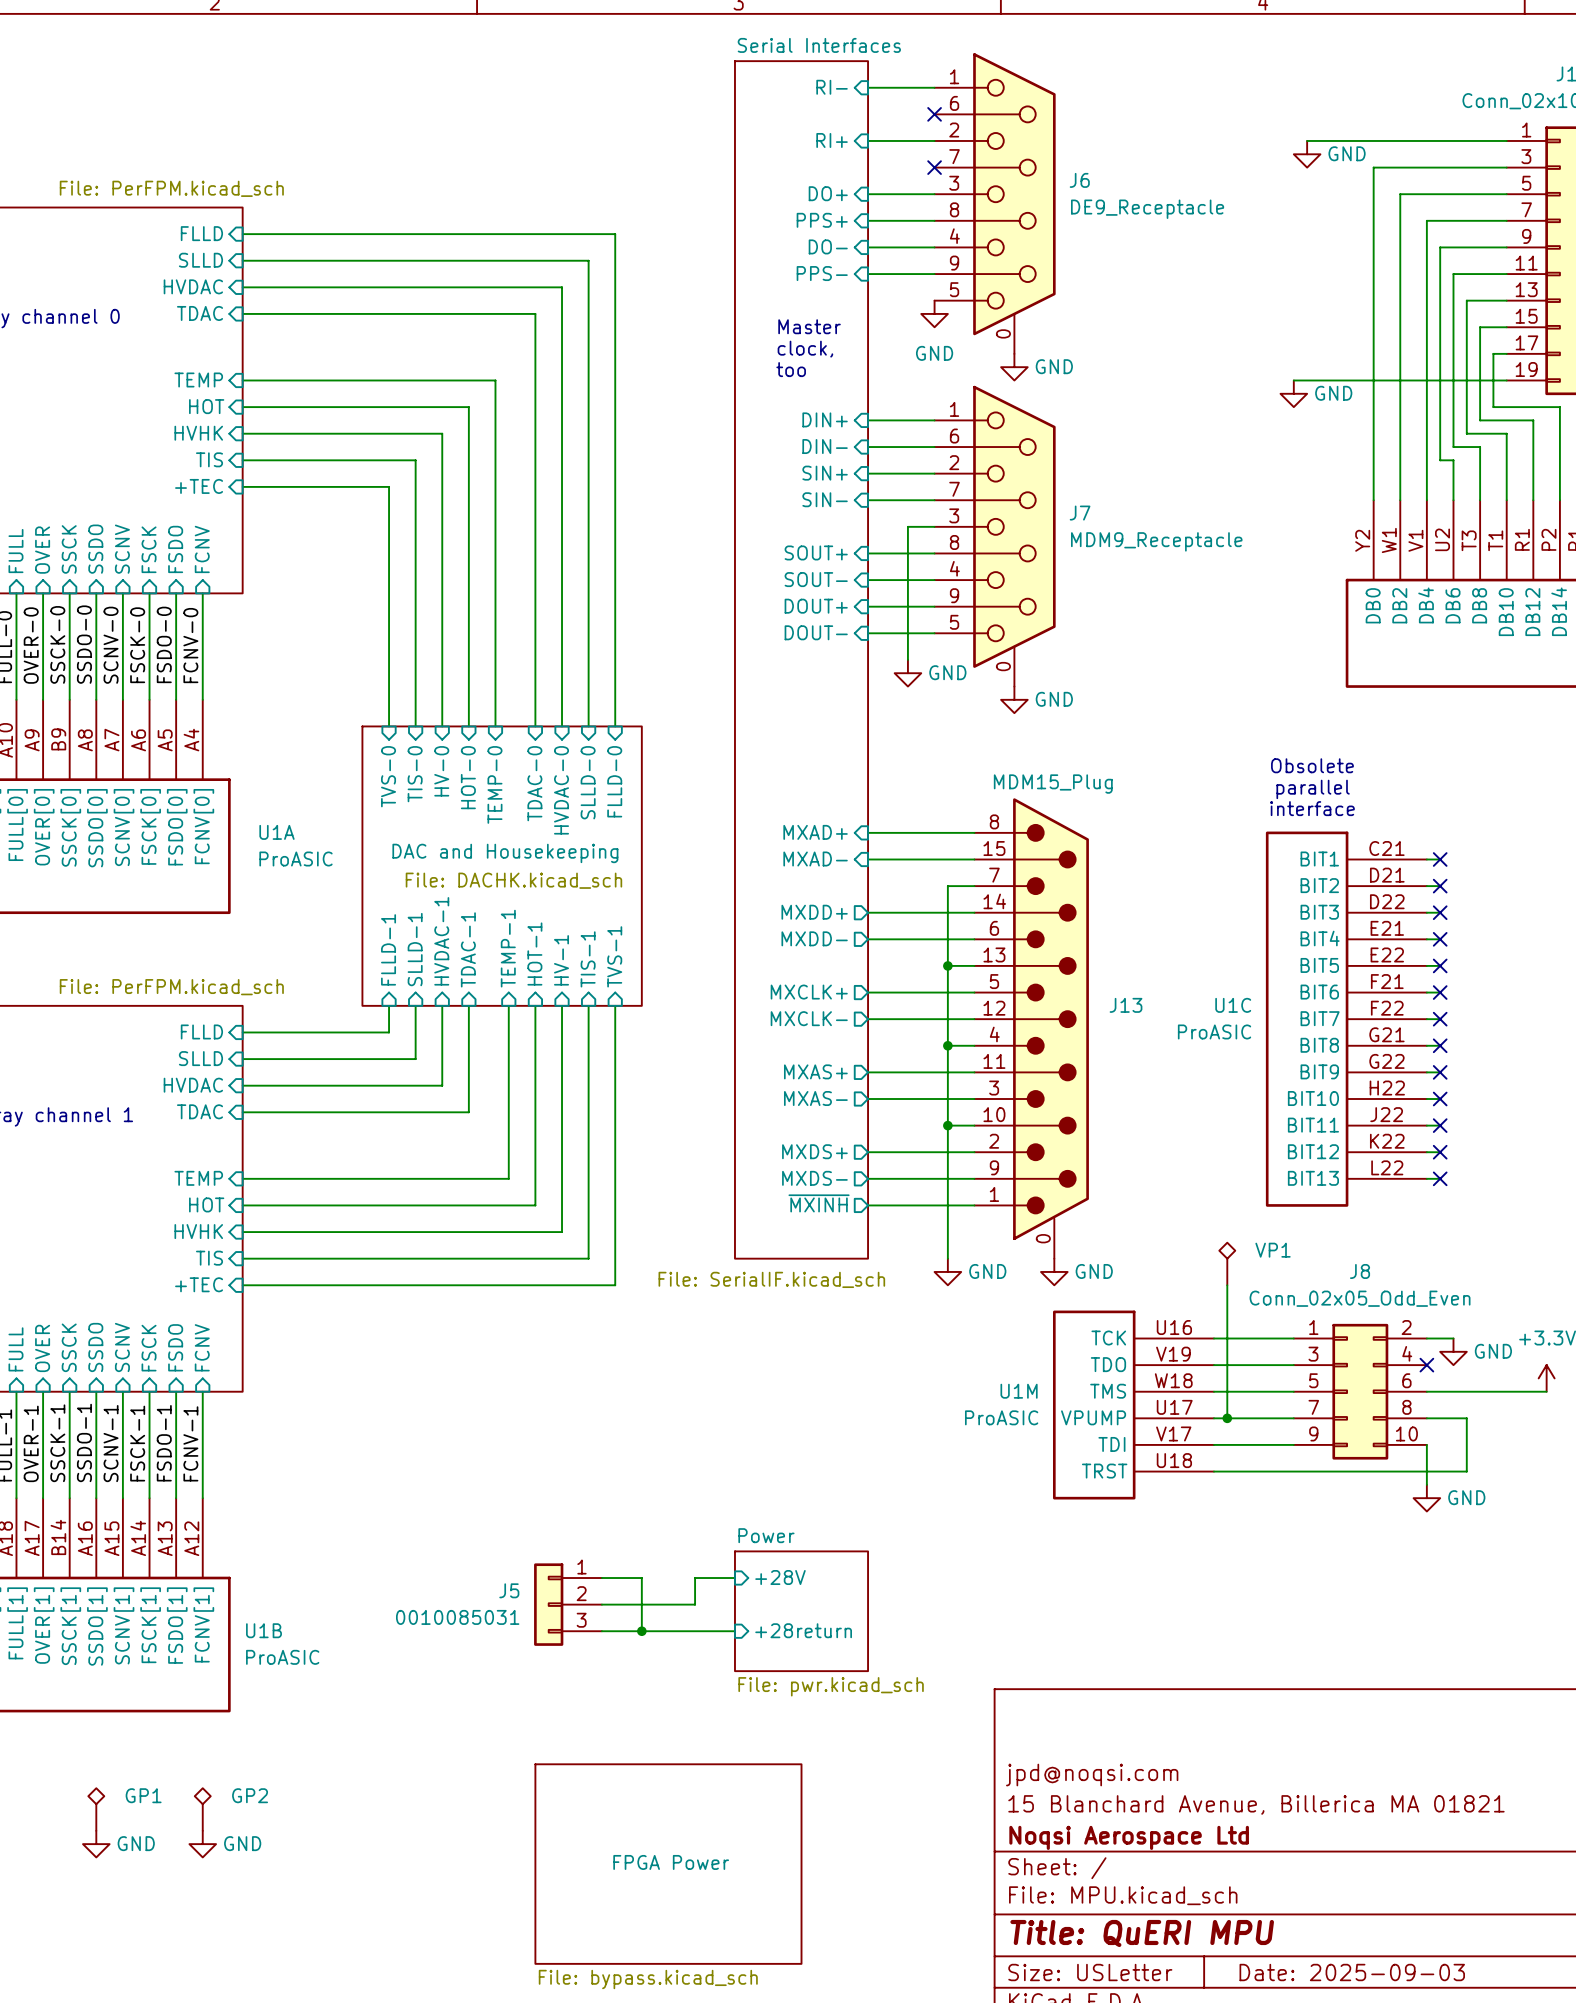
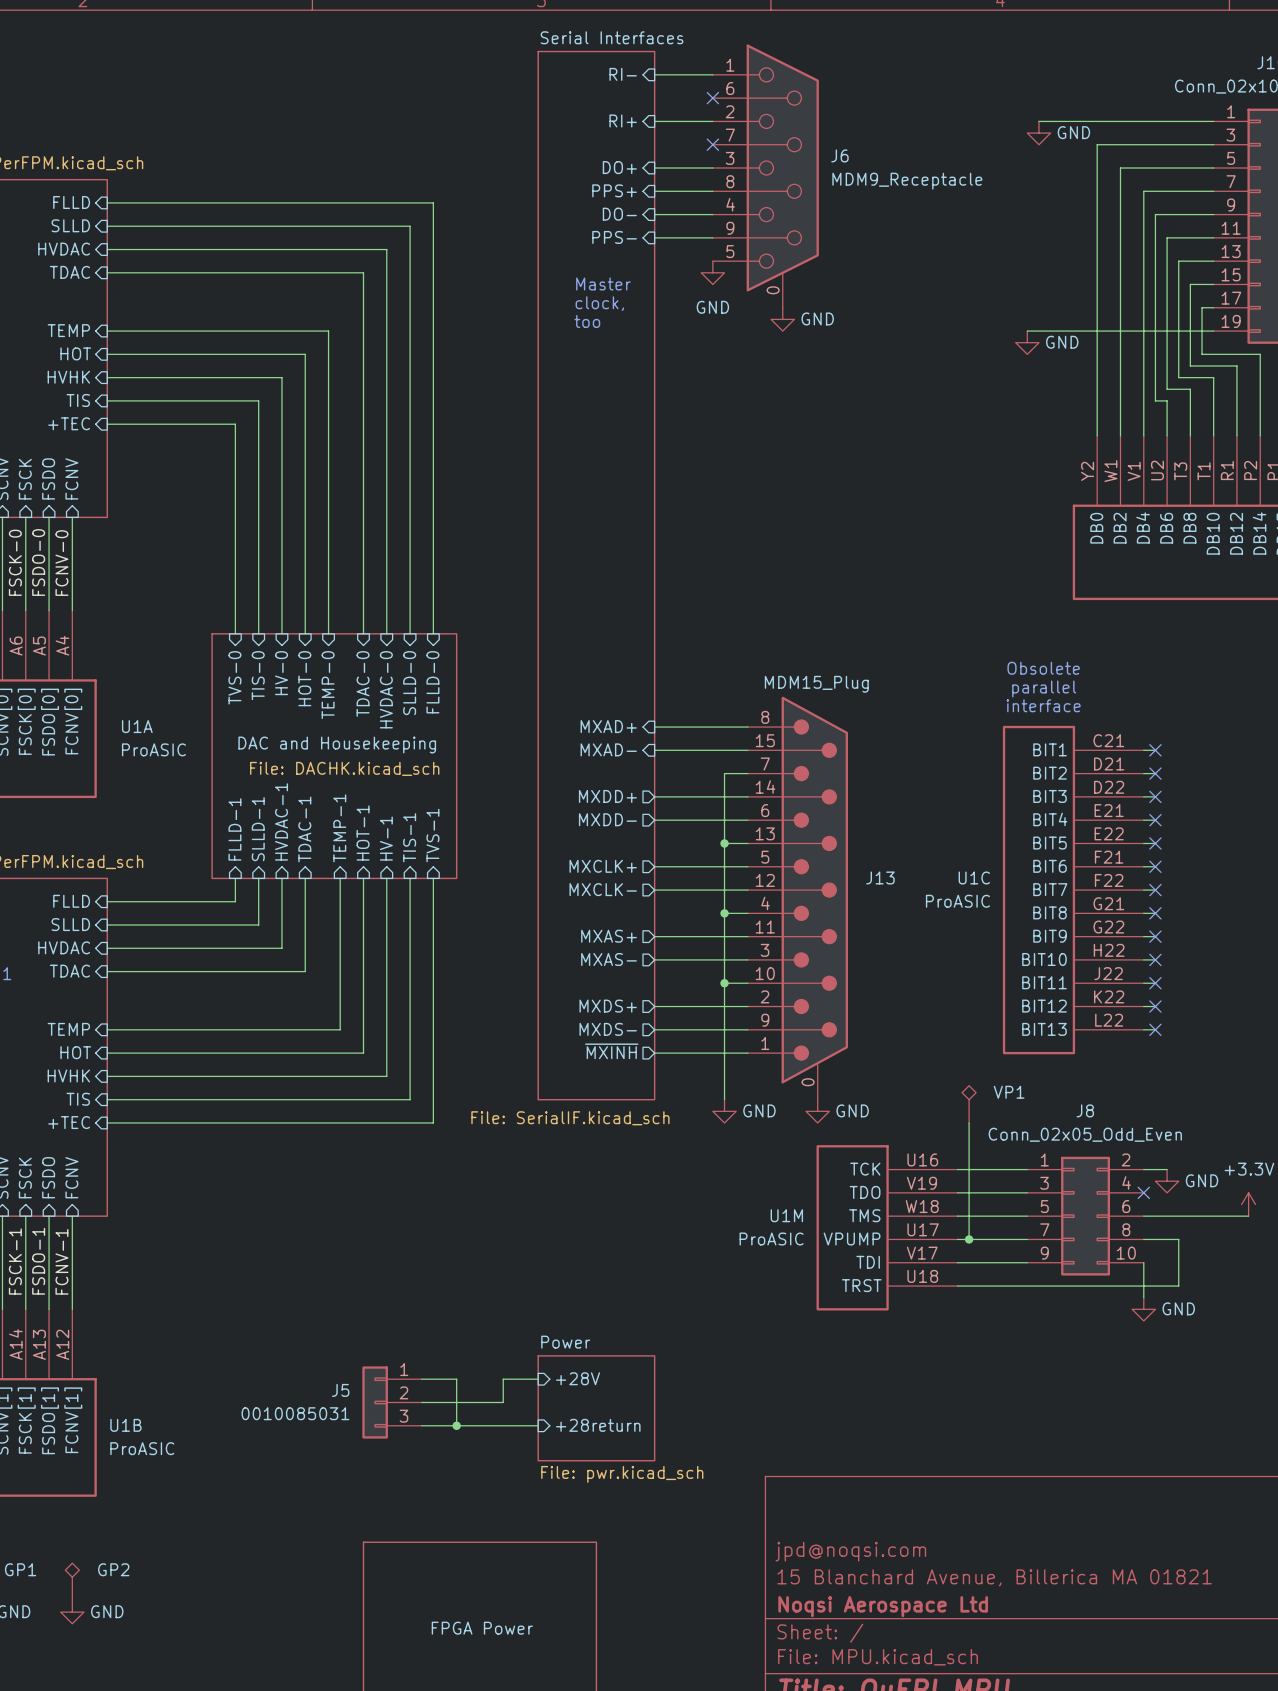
J6 value: DE9_Receptacle (1147, 209) -> MDM9_Receptacle (907, 181)
sheet pin: DIN+ (825, 419) -> none
wire: (868, 420) (934, 420) -> none
sheet pin: DIN- (825, 446) -> none
wire: (868, 447) (934, 447) -> none
sheet pin: SIN+ (825, 473) -> none
wire: (868, 473) (934, 473) -> none
sheet pin: SIN- (825, 499) -> none
wire: (868, 500) (934, 500) -> none
wire: (934, 526) (907, 526) (907, 659) -> none
J7: MDM9_Receptacle (995, 536) -> none
sheet pin: SOUT+ (816, 552) -> none
wire: (868, 553) (934, 553) -> none
sheet pin: SOUT- (816, 579) -> none
wire: (868, 580) (934, 580) -> none
sheet pin: DOUT+ (816, 606) -> none
wire: (868, 606) (934, 606) -> none
sheet pin: DOUT- (816, 632) -> none
wire: (868, 633) (934, 633) -> none
power symbol: GND (907, 673) -> none
power symbol: GND (1014, 699) -> none

